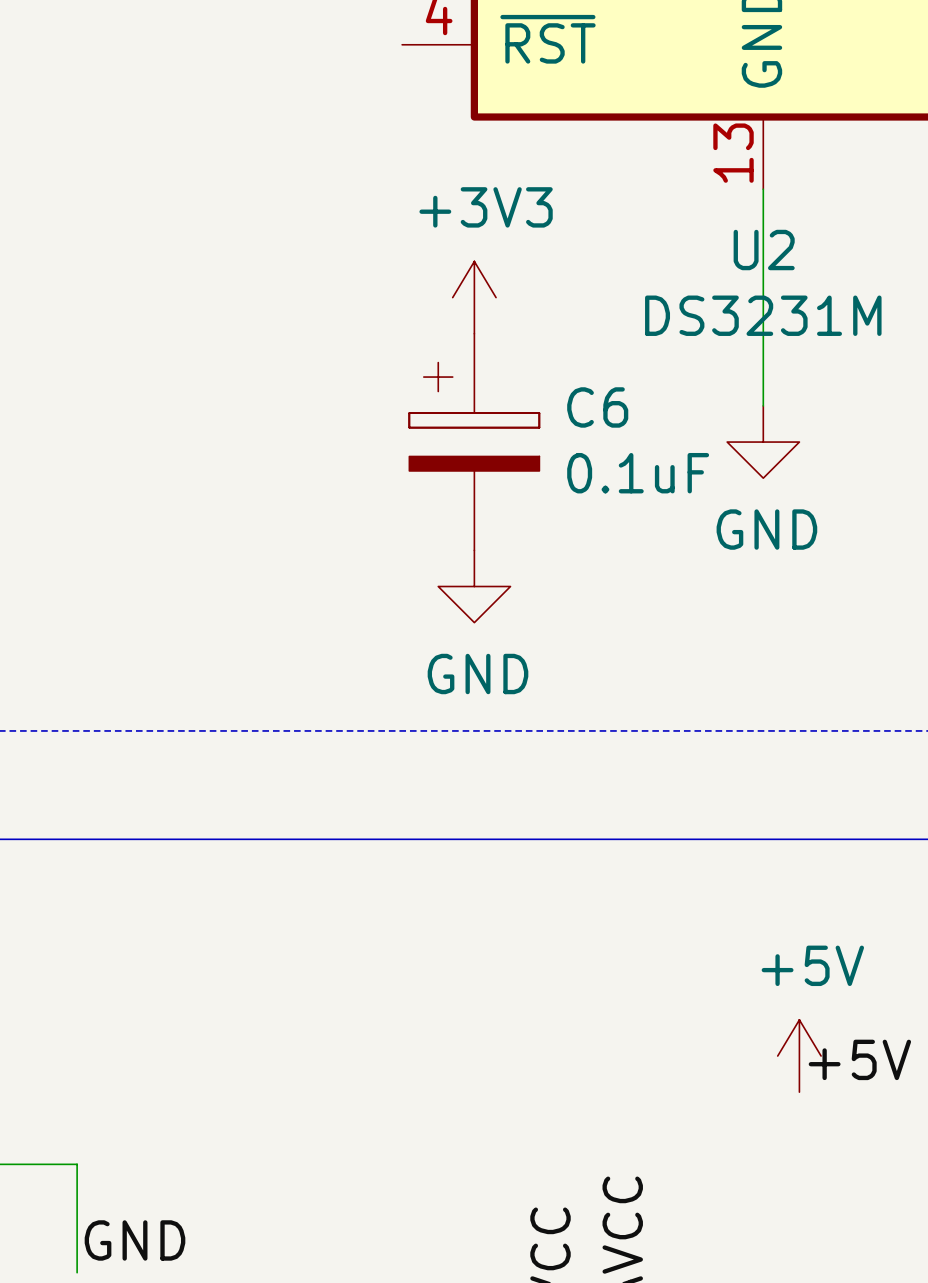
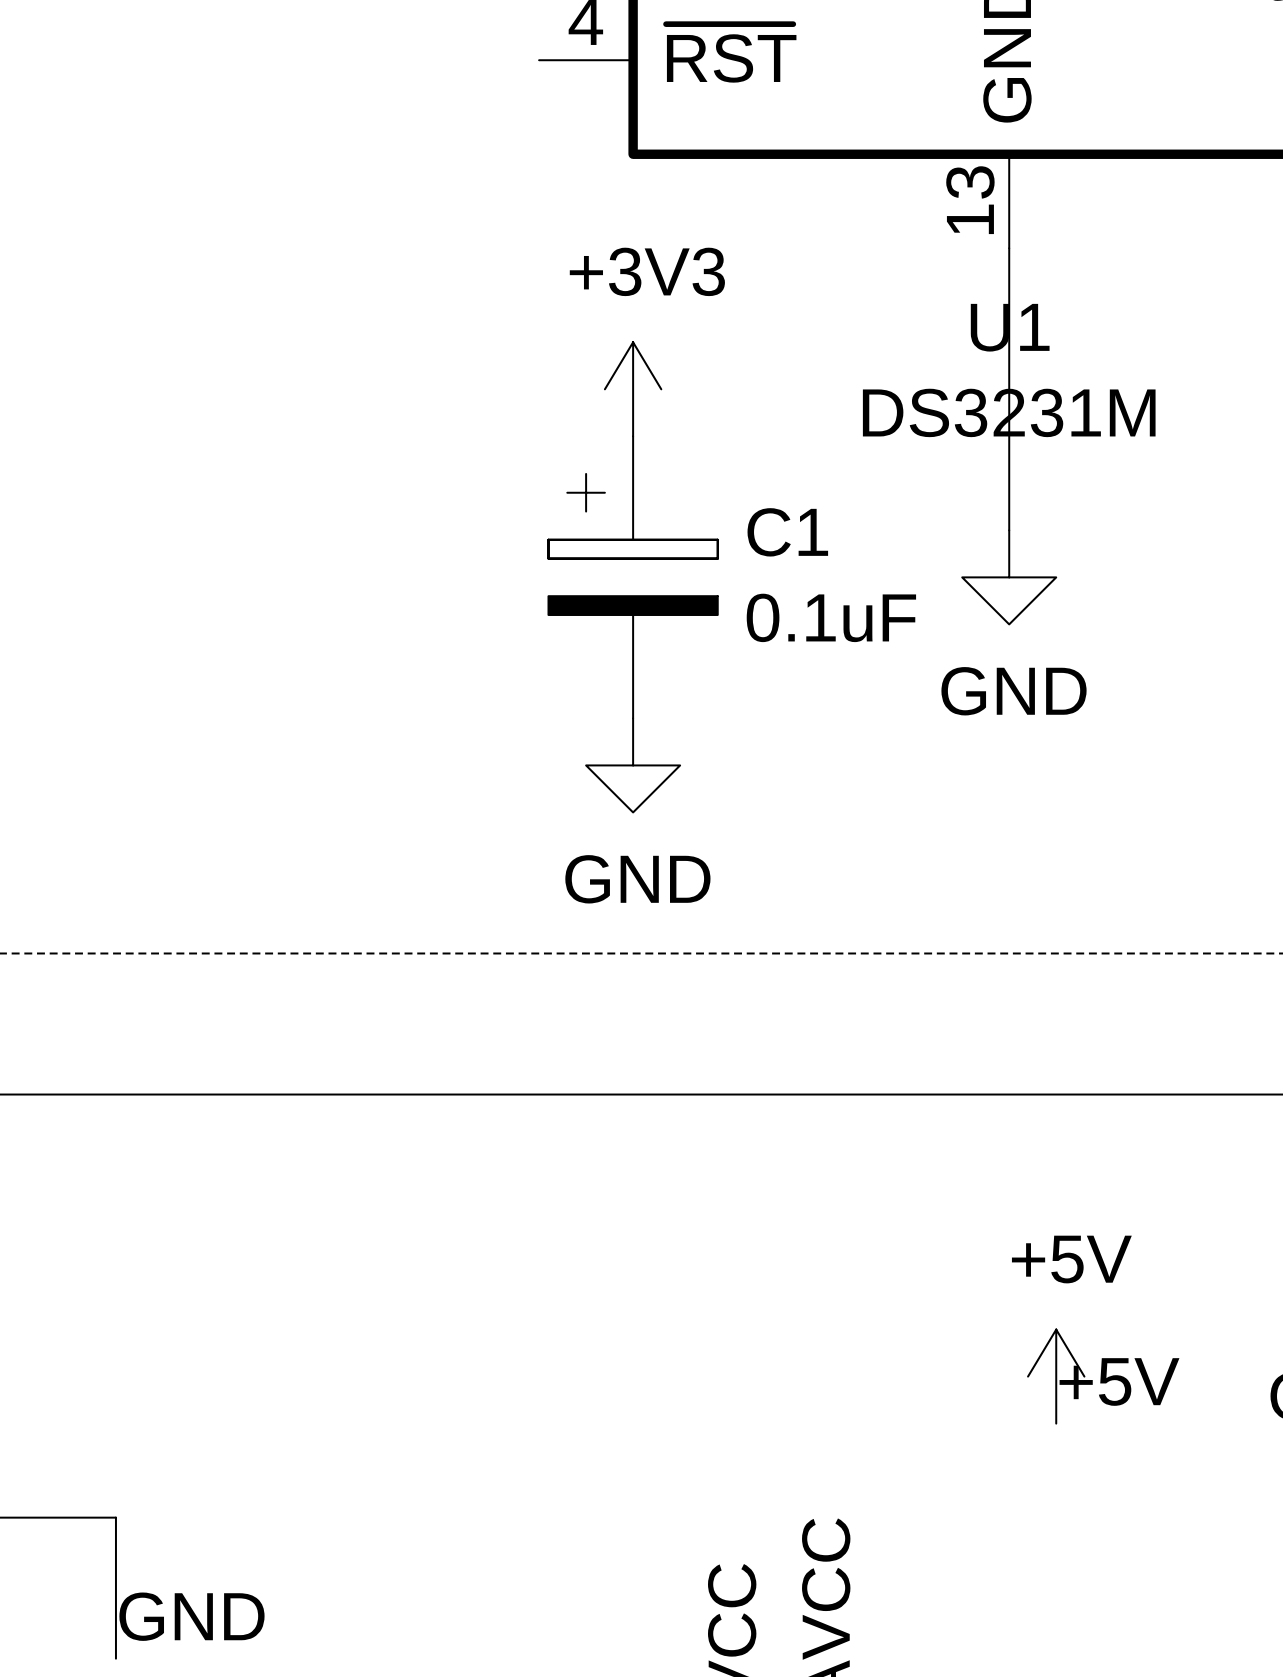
U2 name: U2 (764, 250) -> U1 (1010, 327)
C6 name: C6 (597, 407) -> C1 (787, 532)

